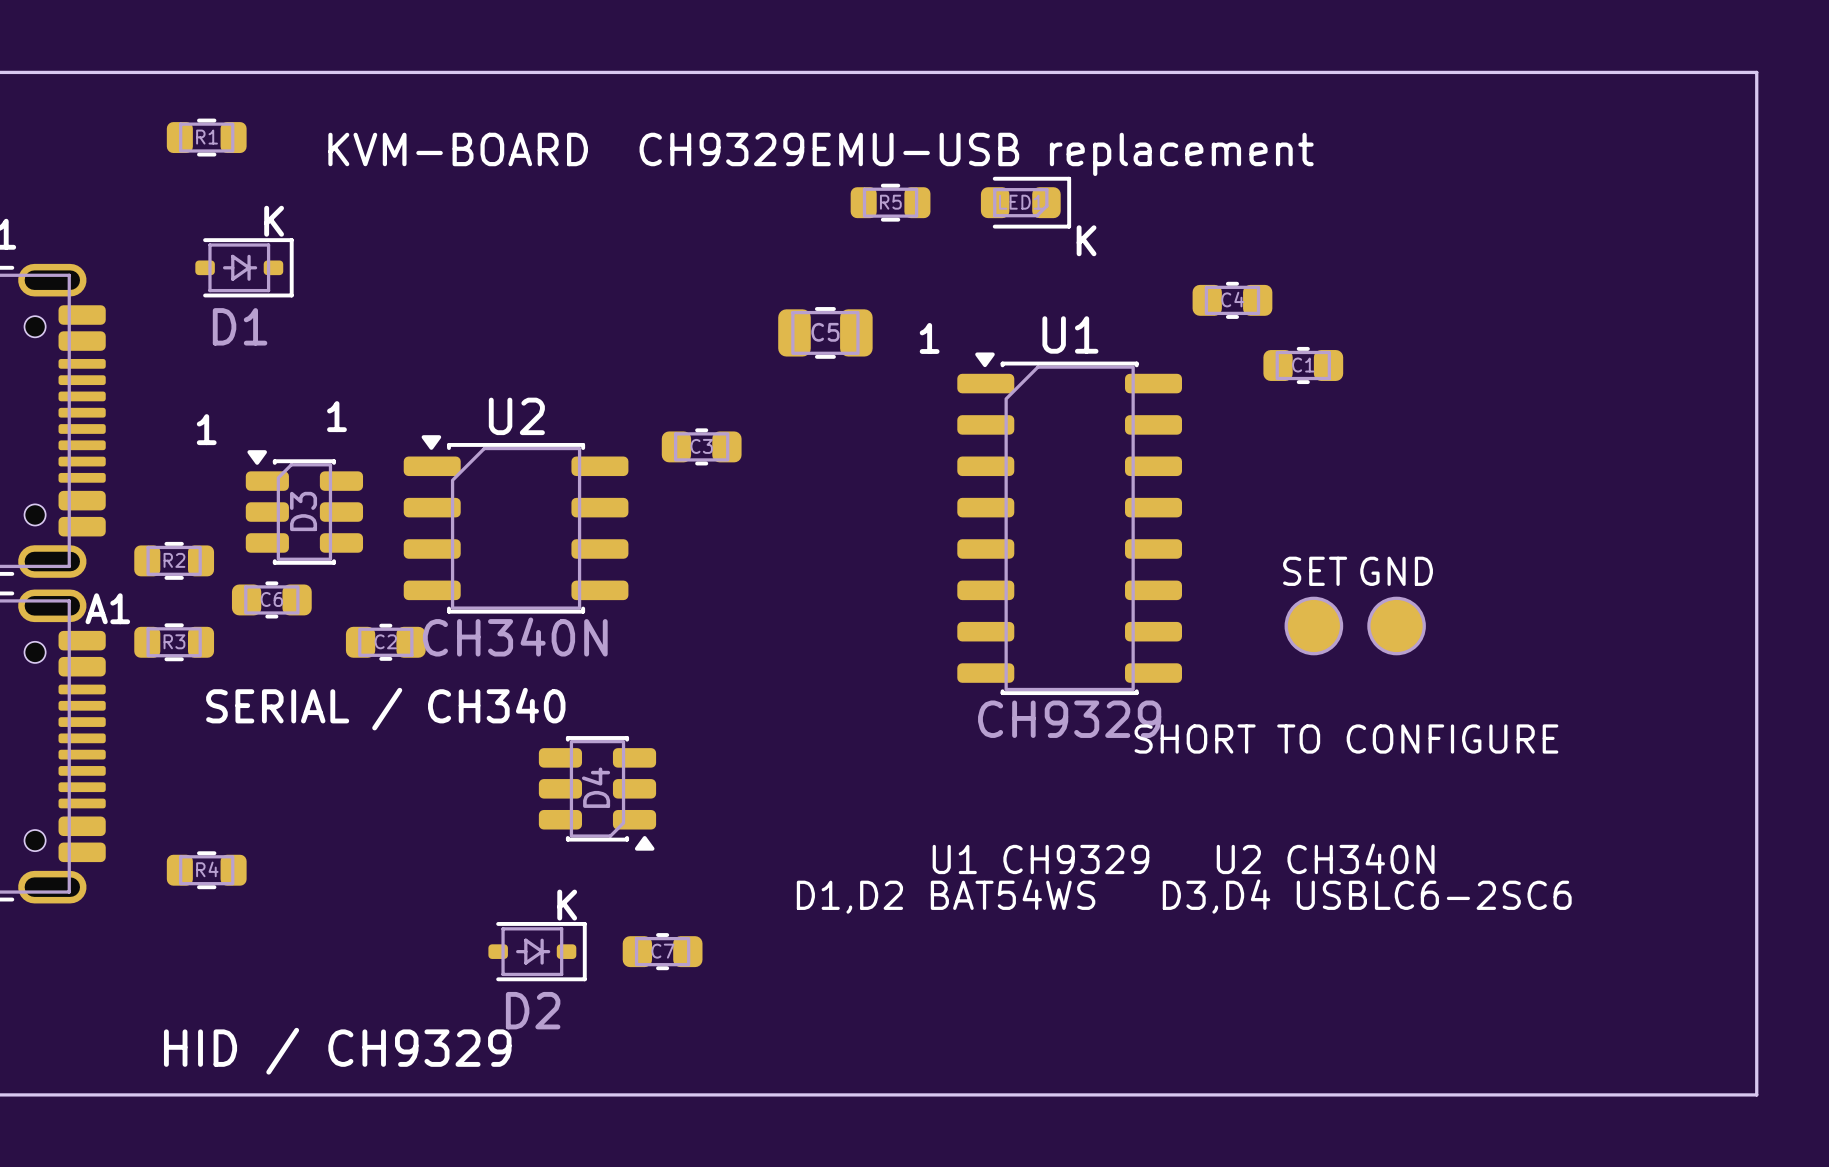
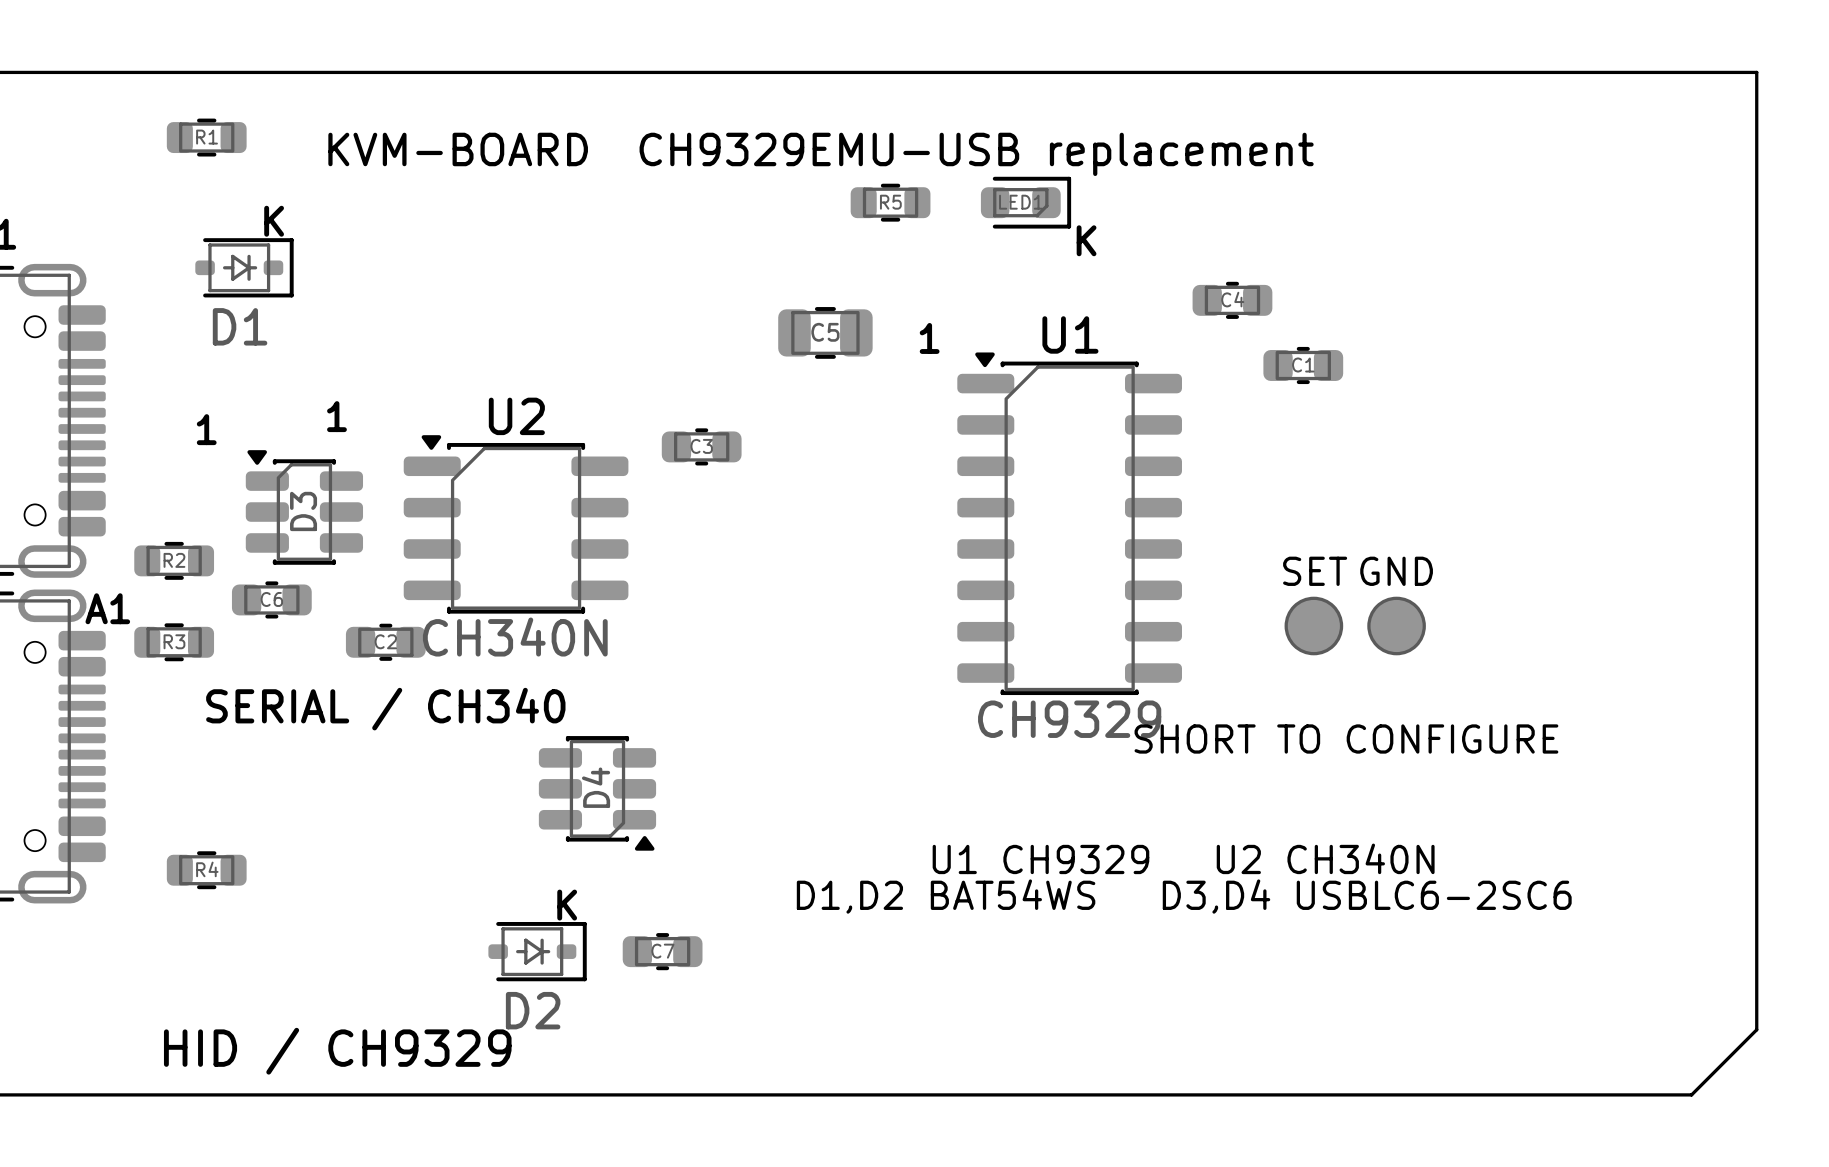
board edge: (1756, 1029) (1756, 1094) (1691, 1094) -> (1756, 1029) (1691, 1094)

